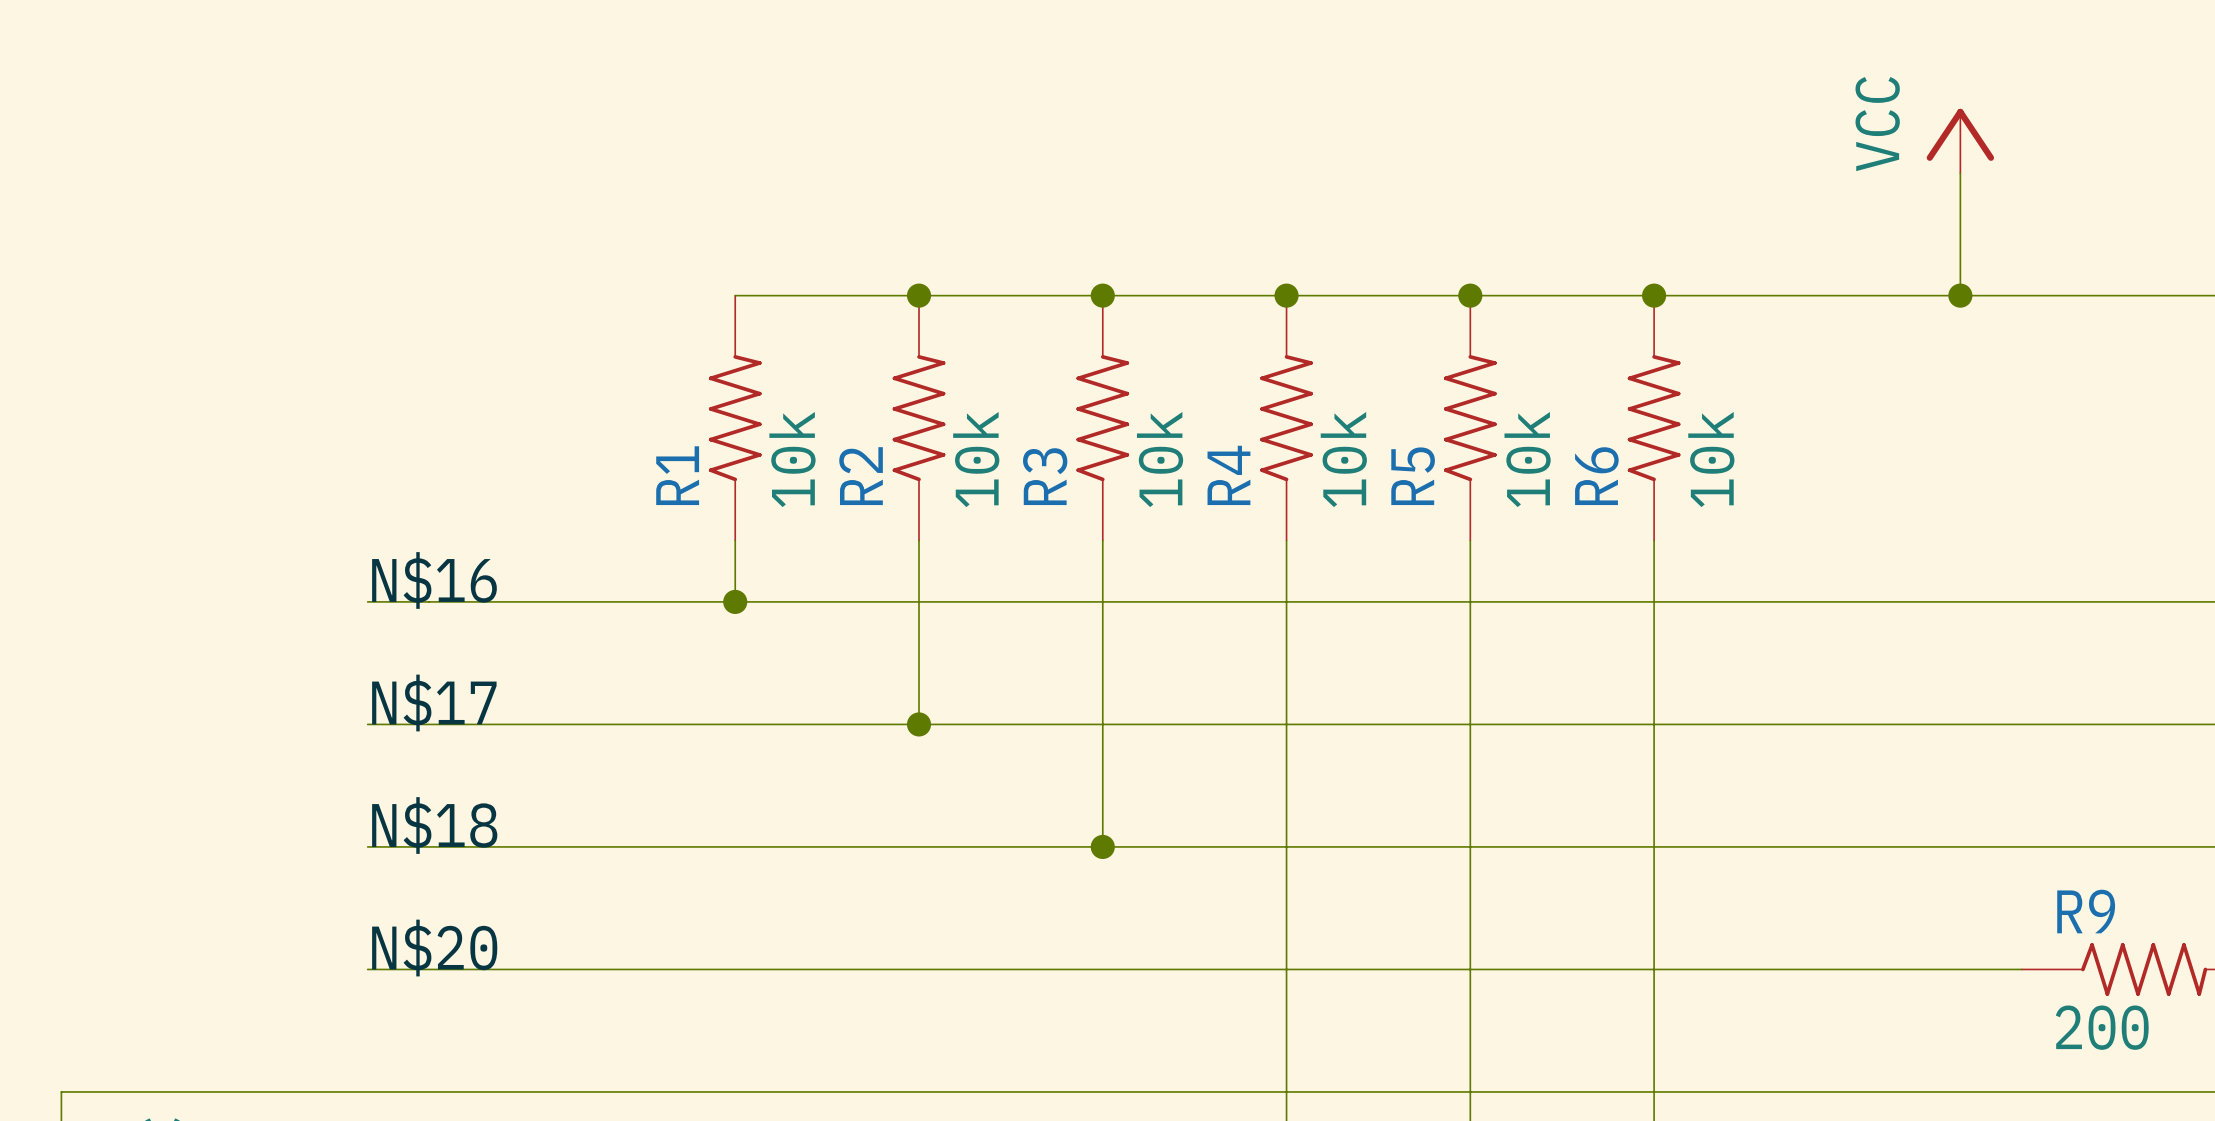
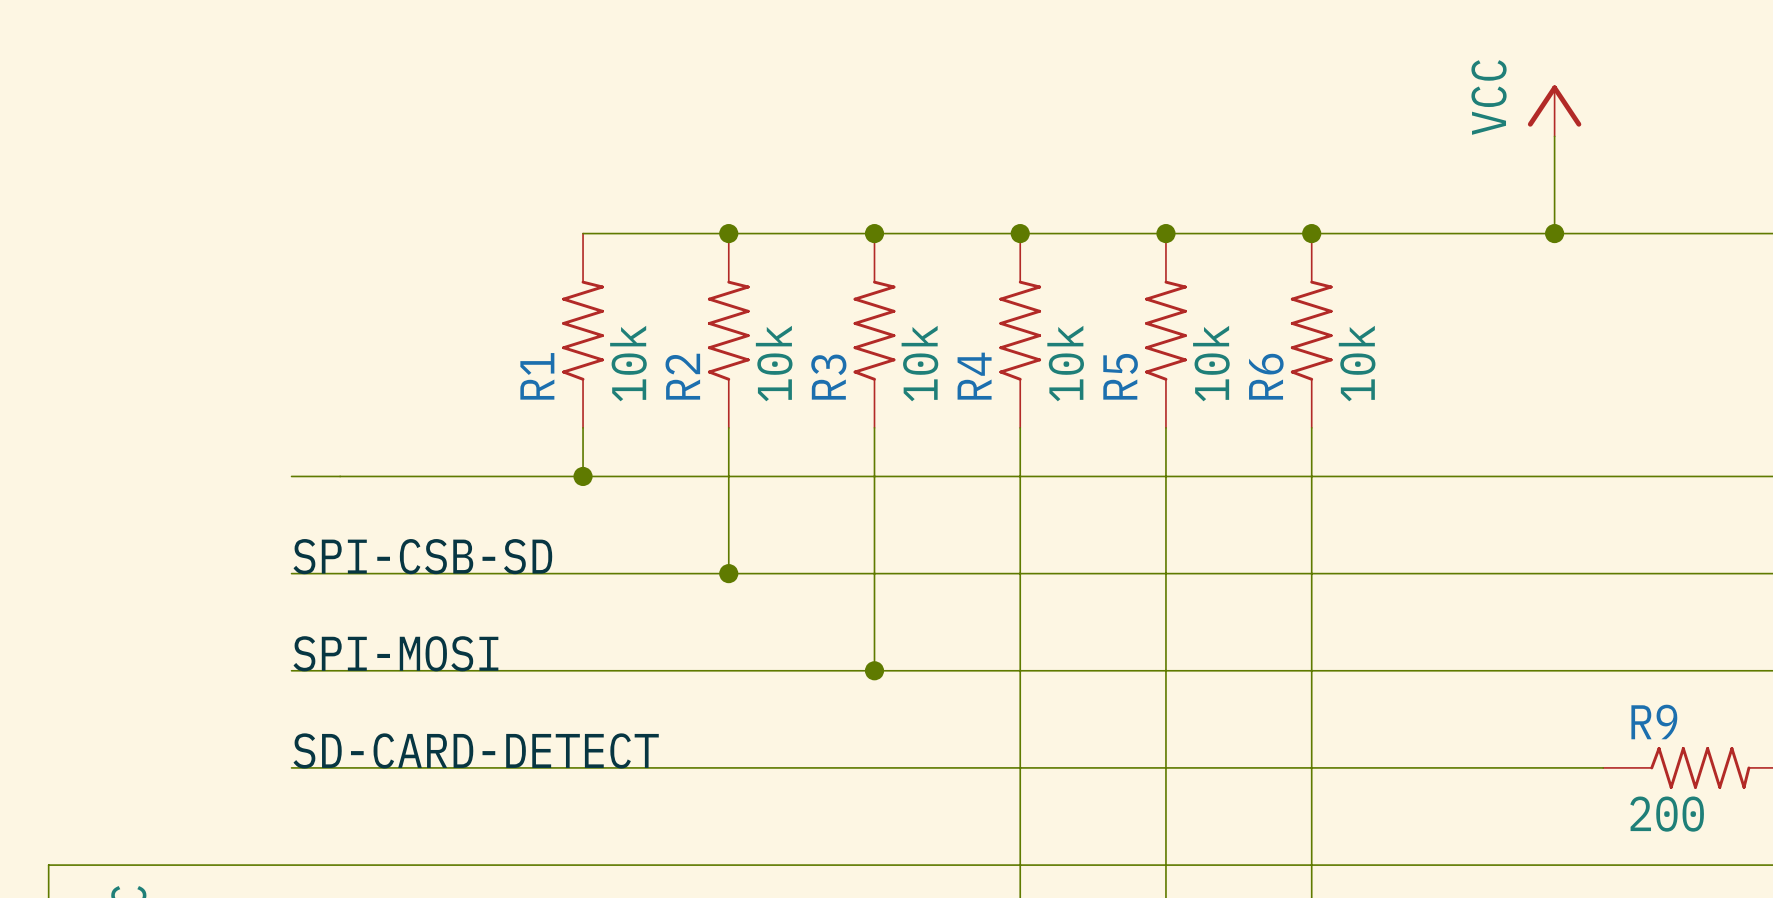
label: N$16 (434, 580) -> none
label: N$17 (434, 702) -> SPI-CSB-SD (422, 556)
label: N$18 (434, 825) -> SPI-MOSI (395, 653)
label: N$20 (434, 948) -> SD-CARD-DETECT (476, 750)

